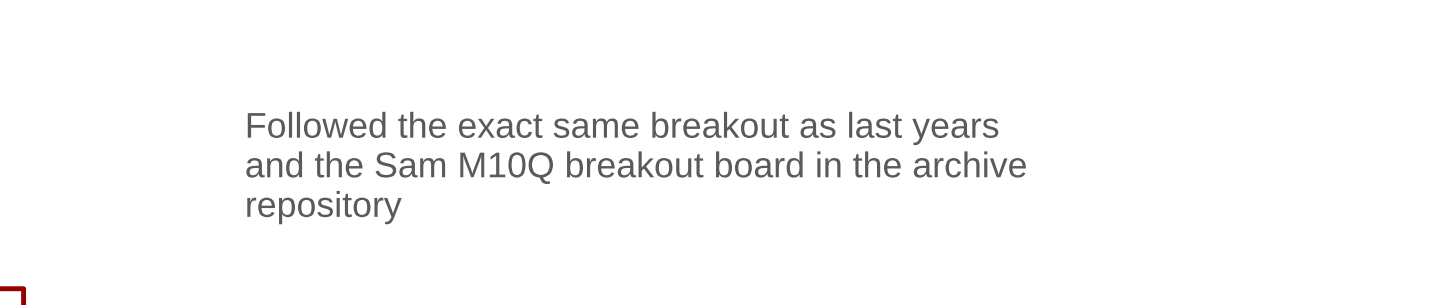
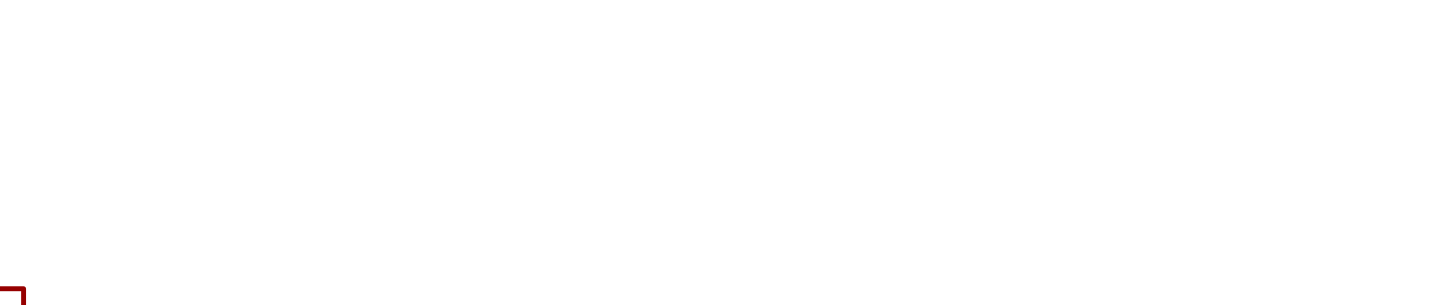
text: Followed the exact same breakout as last years (623, 128) -> none
text: and the Sam M10Q breakout board in the archive (636, 167) -> none
text: repository (324, 207) -> none

